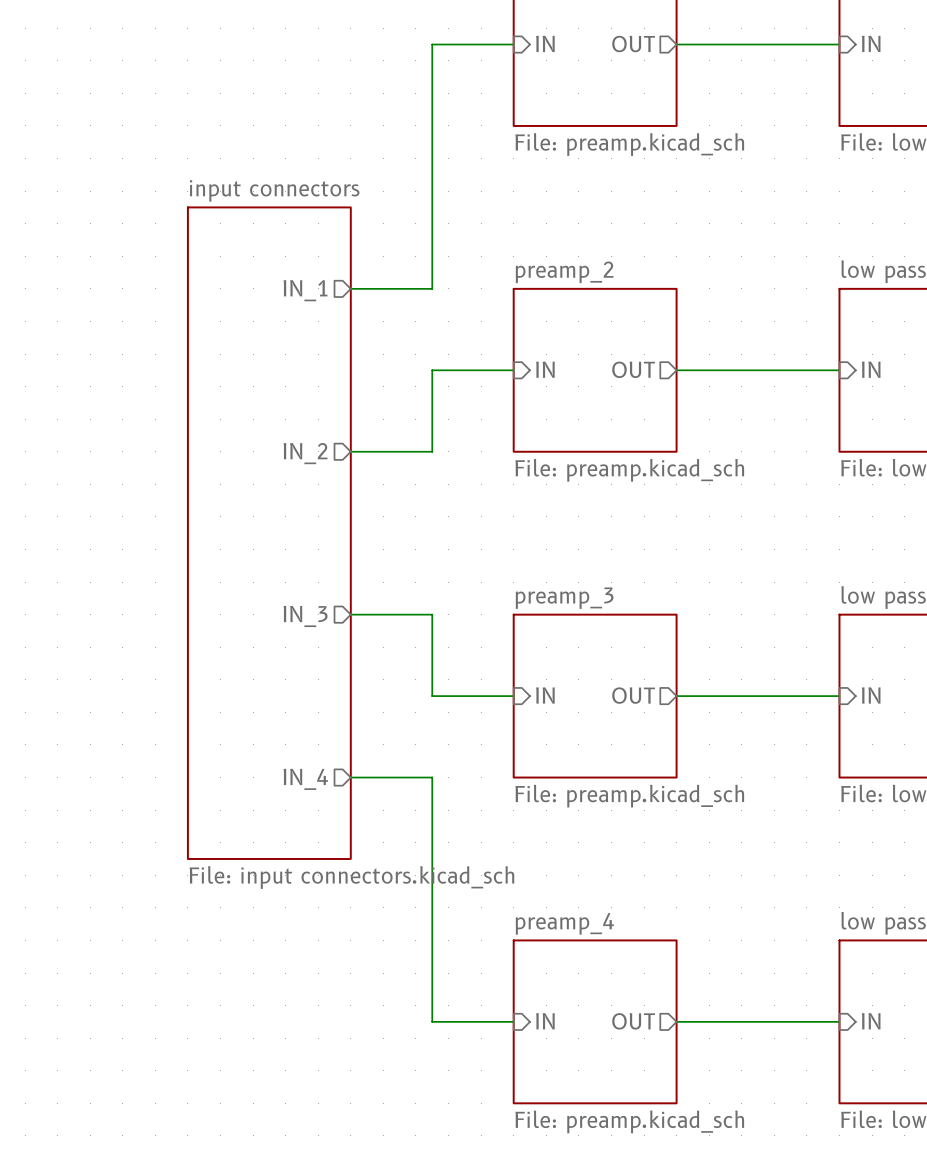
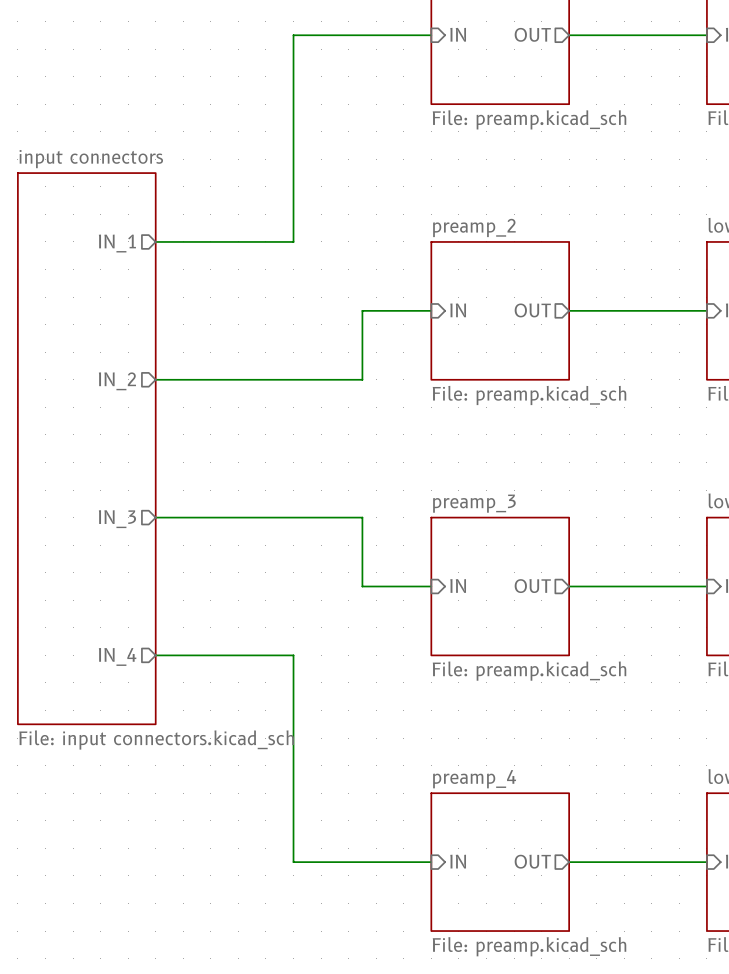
wire: (432, 44) (432, 288) (350, 288) -> (362, 35) (293, 35) (293, 241) (155, 241)
sheet pin position: IN_1 (305, 290) -> IN_1 (117, 243)
wire: none -> (155, 379) (293, 379)
sheet pin position: IN_2 (305, 453) -> IN_2 (117, 381)
sheet input connectors position: (269, 533) -> (86, 448)
wire: none -> (155, 517) (293, 517)
sheet pin position: IN_3 (305, 616) -> IN_3 (117, 519)
wire: (350, 777) (432, 777) (432, 1021) -> (155, 655) (293, 655) (293, 862) (362, 862)
sheet pin position: IN_4 (305, 779) -> IN_4 (117, 656)

